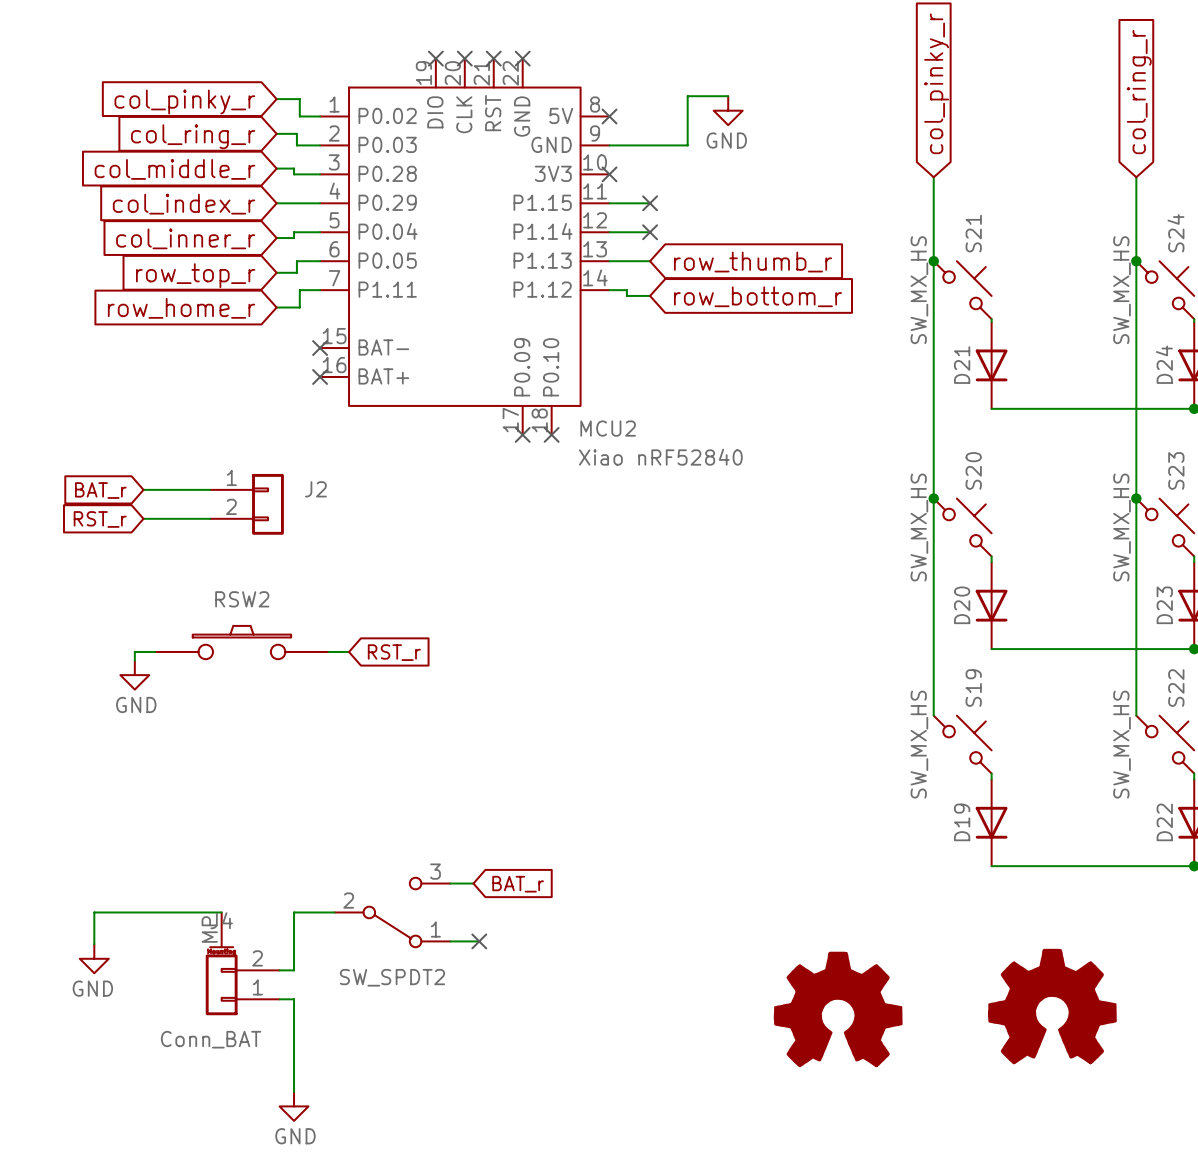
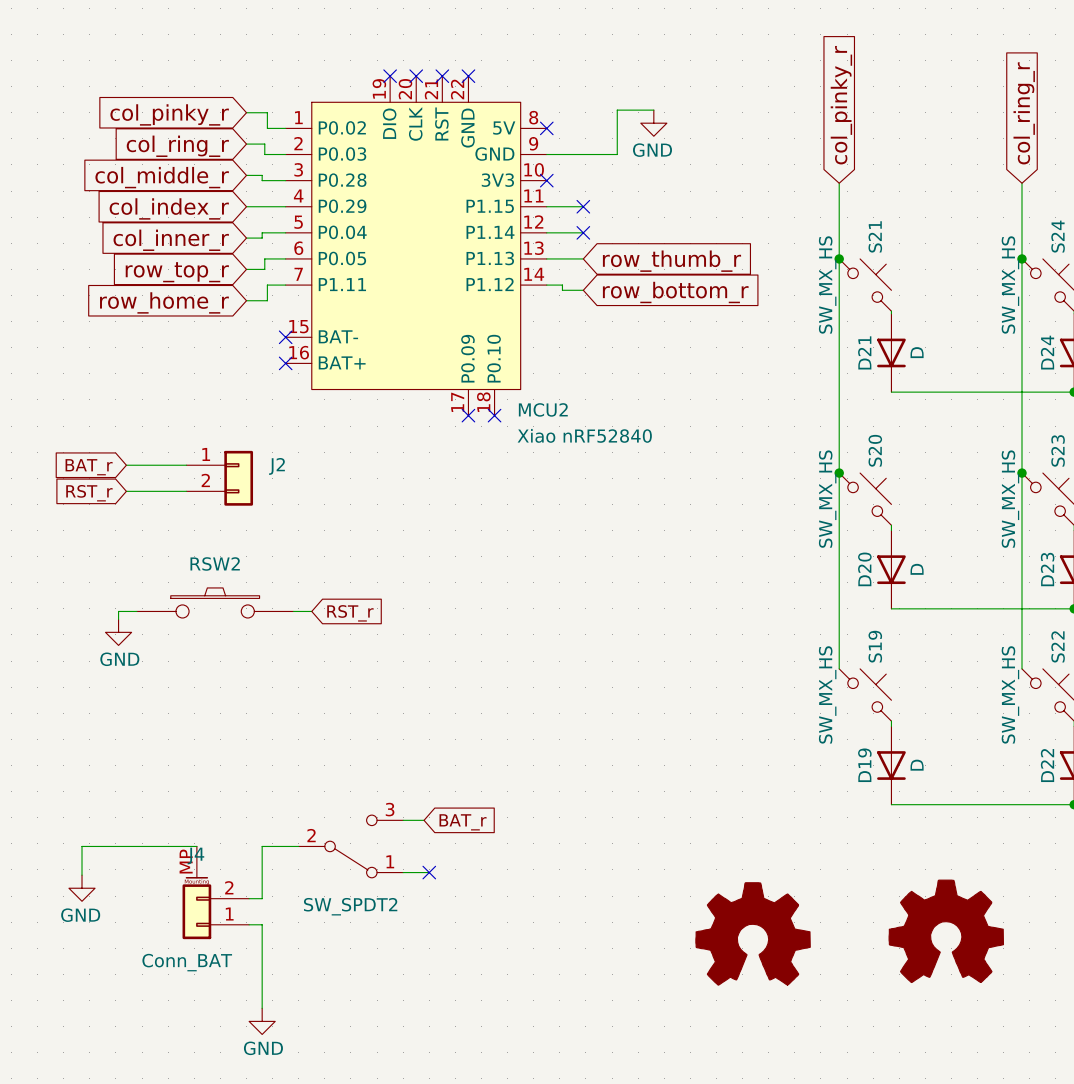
D21 value: none -> D (917, 352)
D20 value: none -> D (917, 569)
D19 value: none -> D (917, 765)

